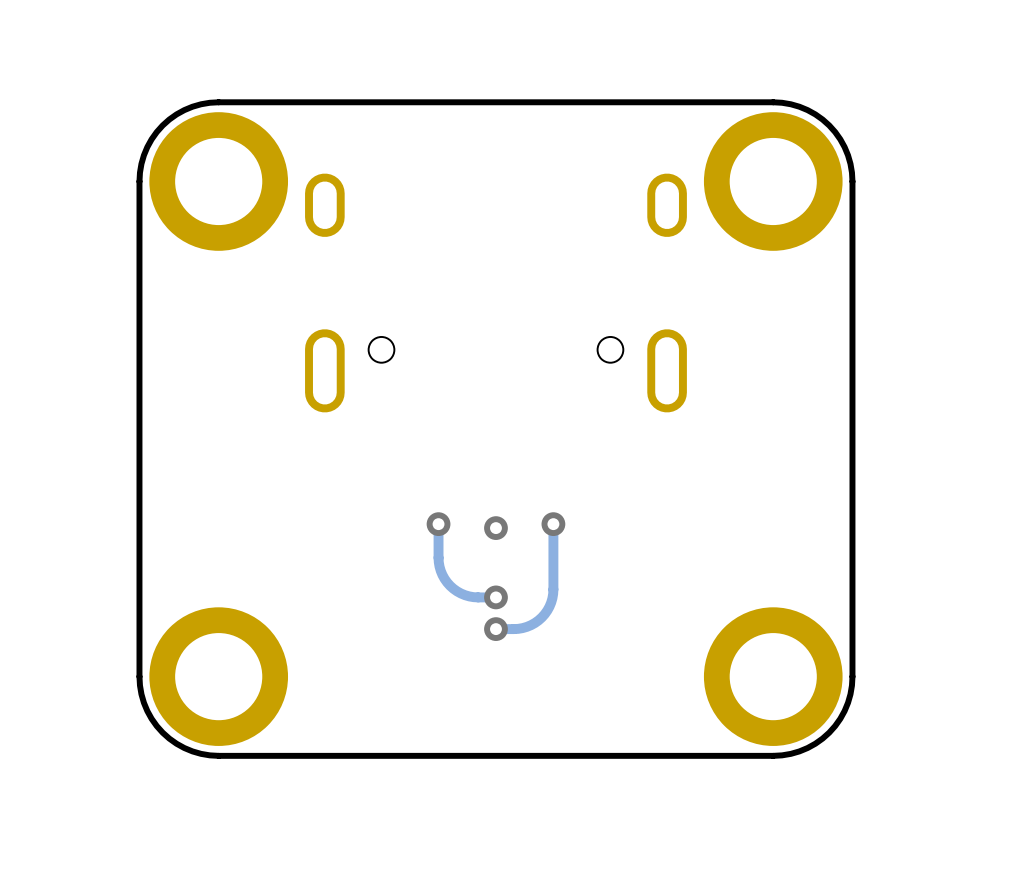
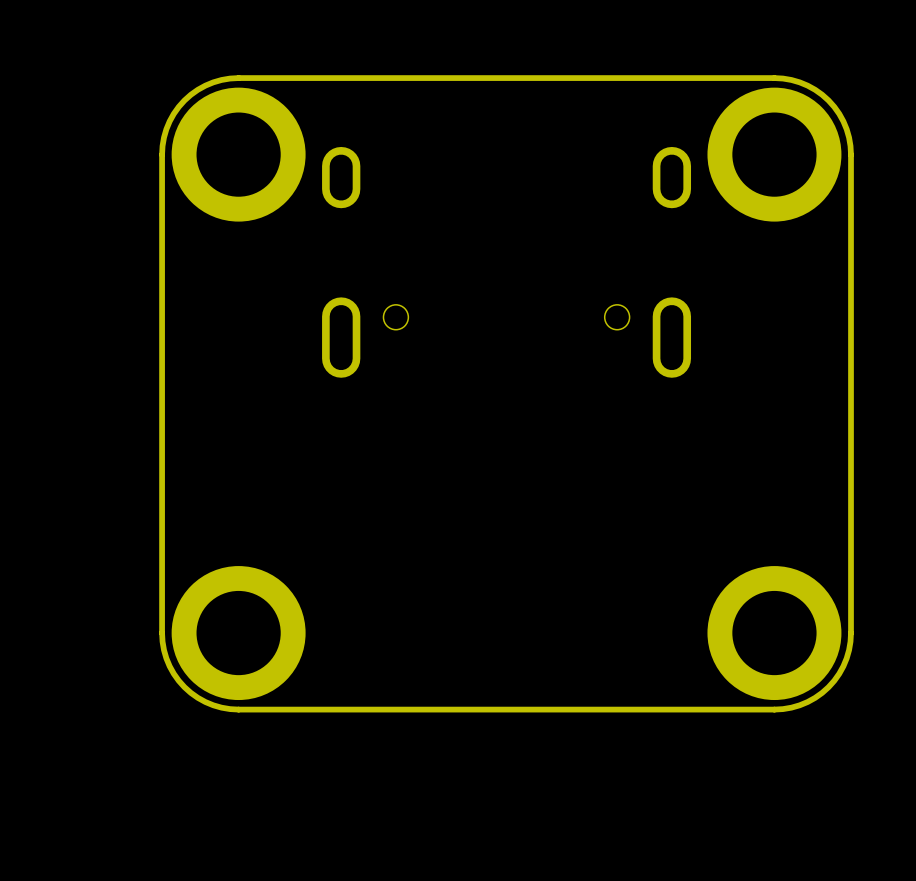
track: (438, 524) (438, 562) (447, 582) (465, 595) (495, 597) -> none
via: (438, 524) -> none
track: (553, 524) (553, 589) (549, 606) (541, 617) (530, 625) (518, 628) (495, 629) -> none
via: (553, 524) -> none
via: (495, 528) -> none
via: (495, 597) -> none
via: (495, 629) -> none

